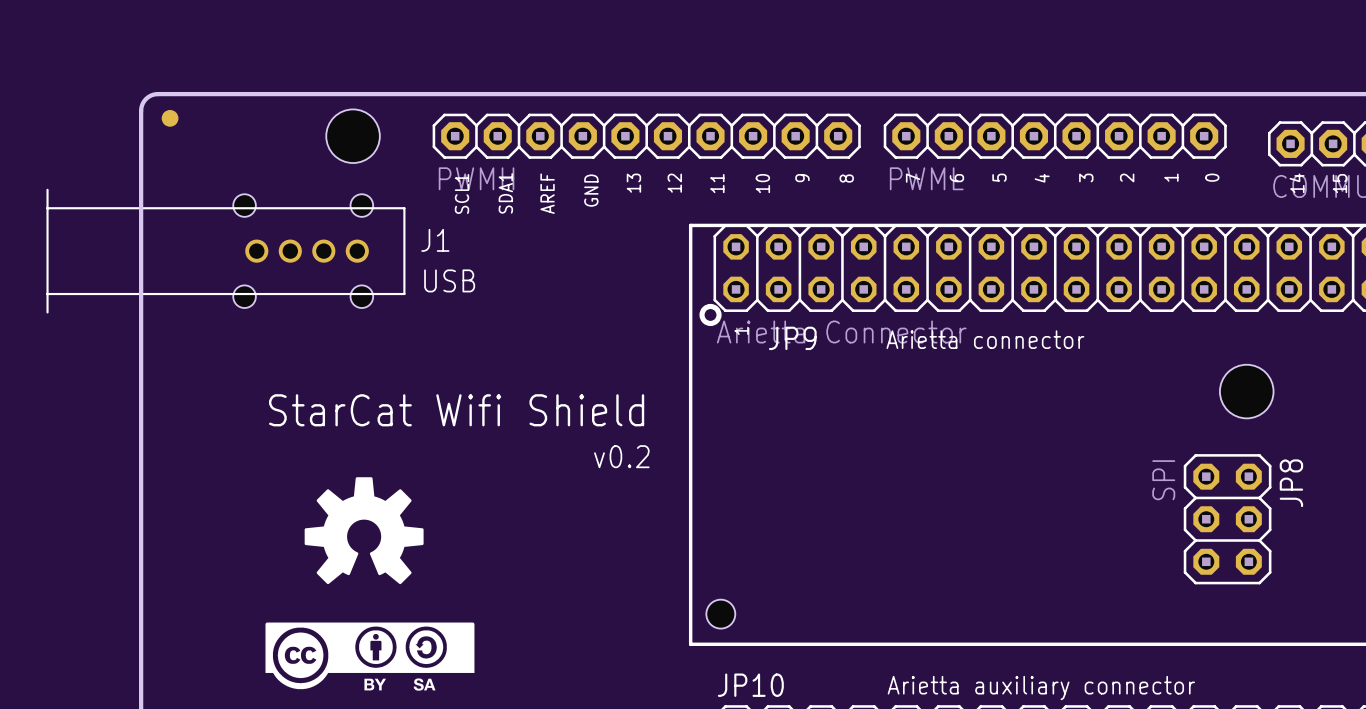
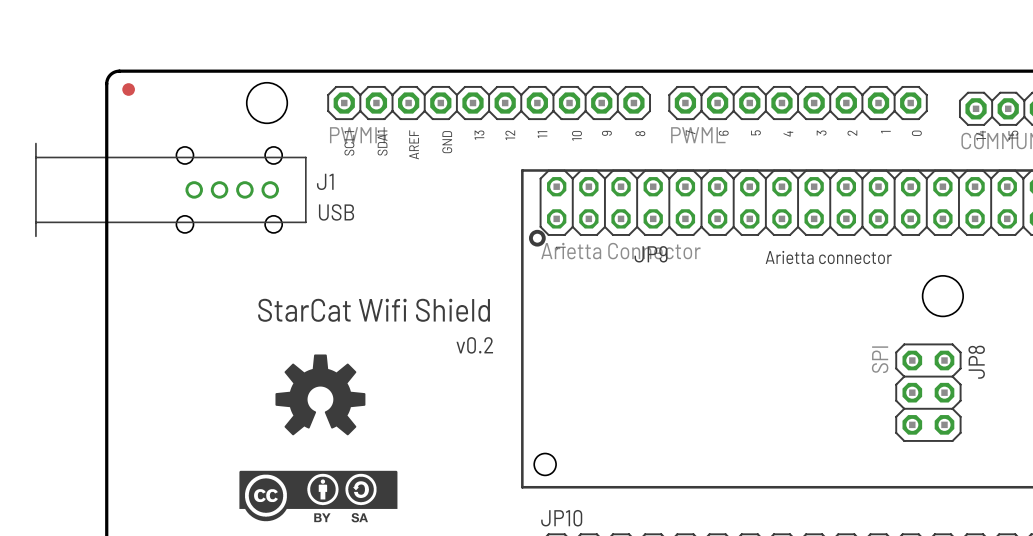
JP9 name position: JP9 (792, 338) -> JP9 (651, 254)
text position: Arietta connector (985, 339) -> Arietta connector (828, 257)
drawing position: (364, 530) -> (320, 394)
drawing position: (369, 656) -> (318, 496)
text: Arietta auxiliary connector (1041, 688) -> none

